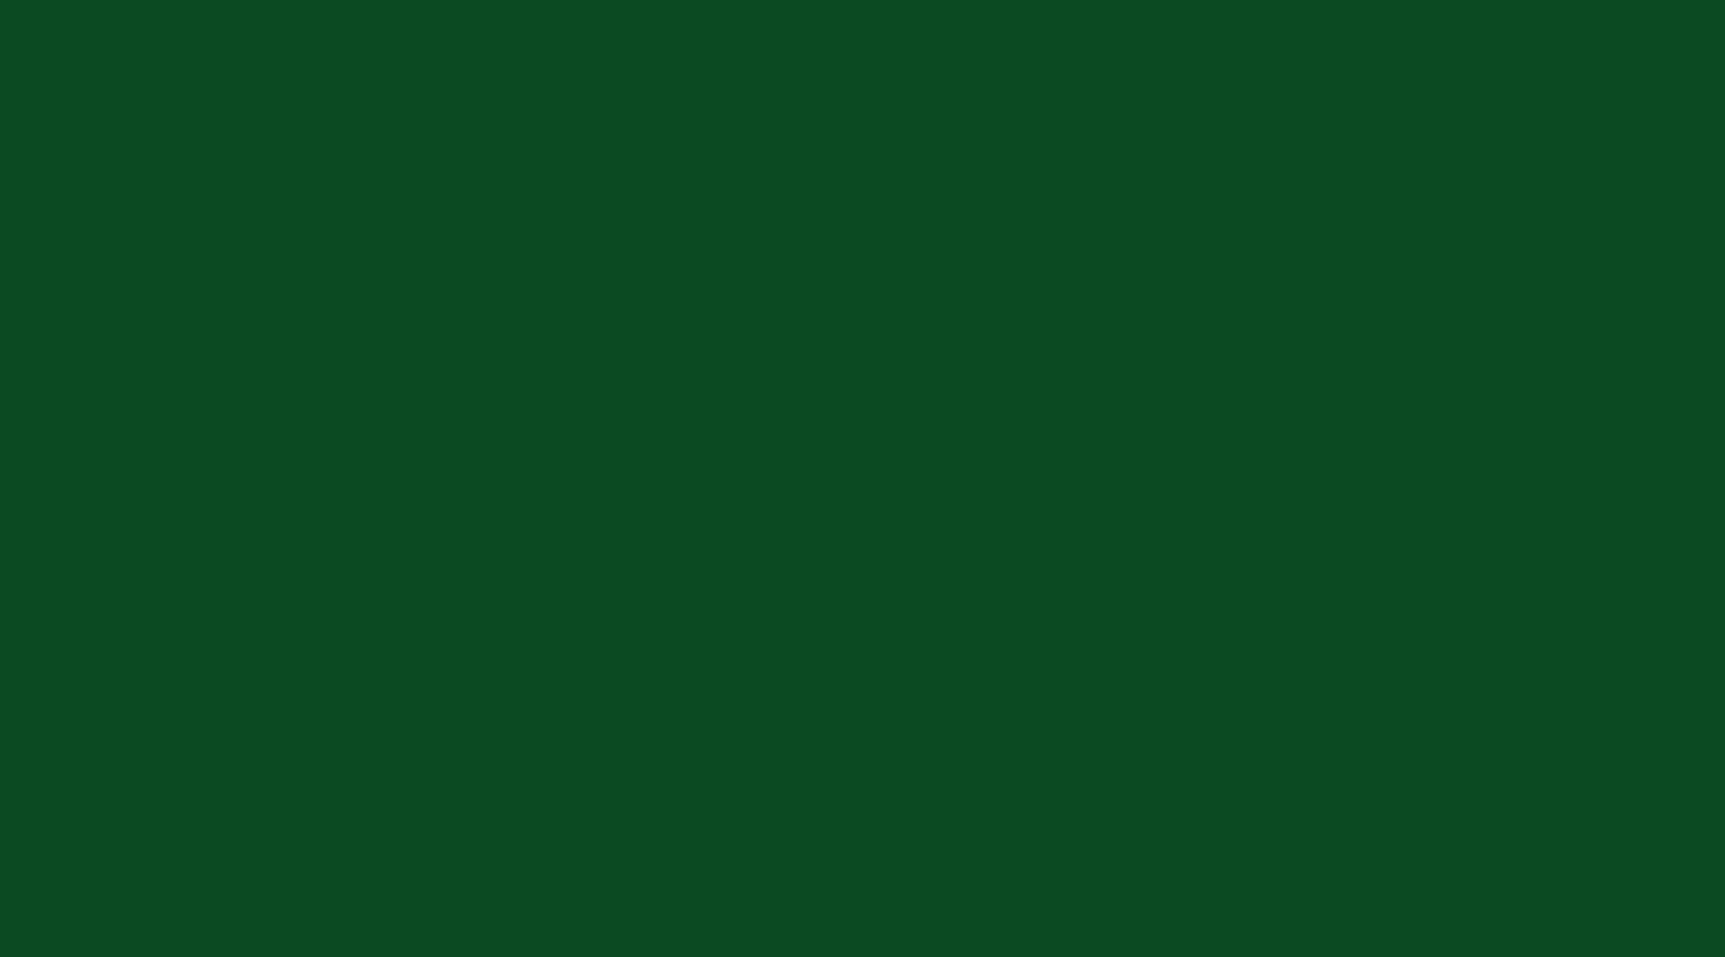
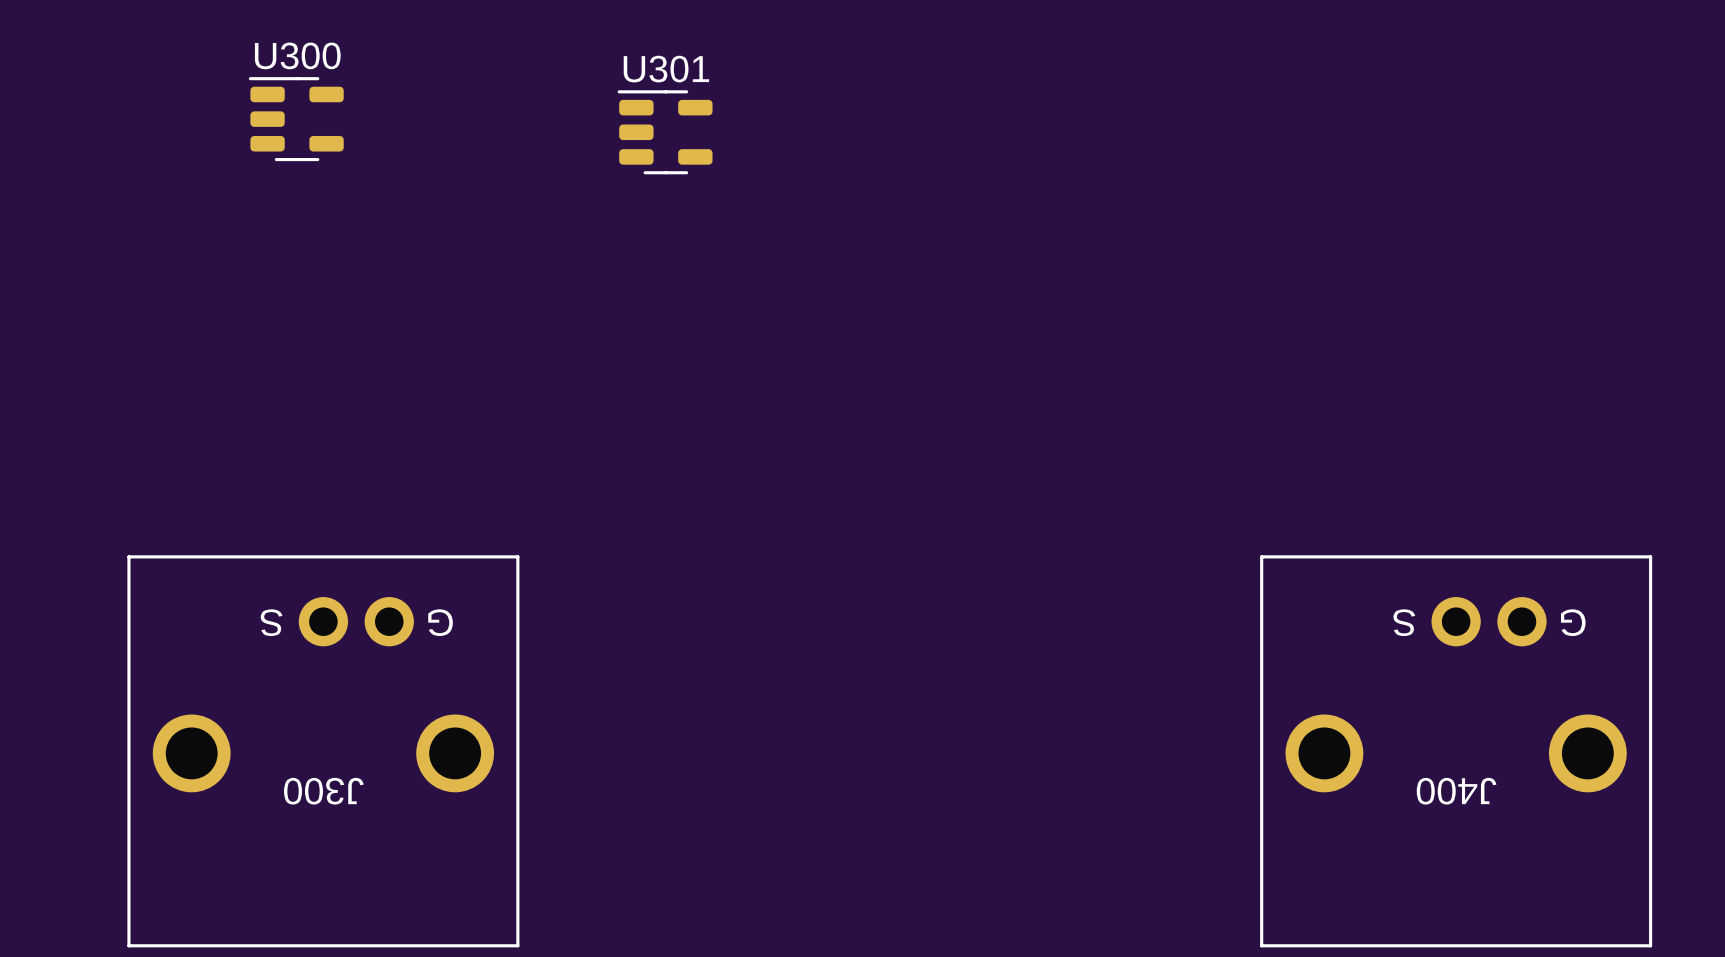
U300: none -> (296, 119)
U301: none -> (665, 132)
J300: none -> (323, 751)
J400: none -> (1456, 751)

